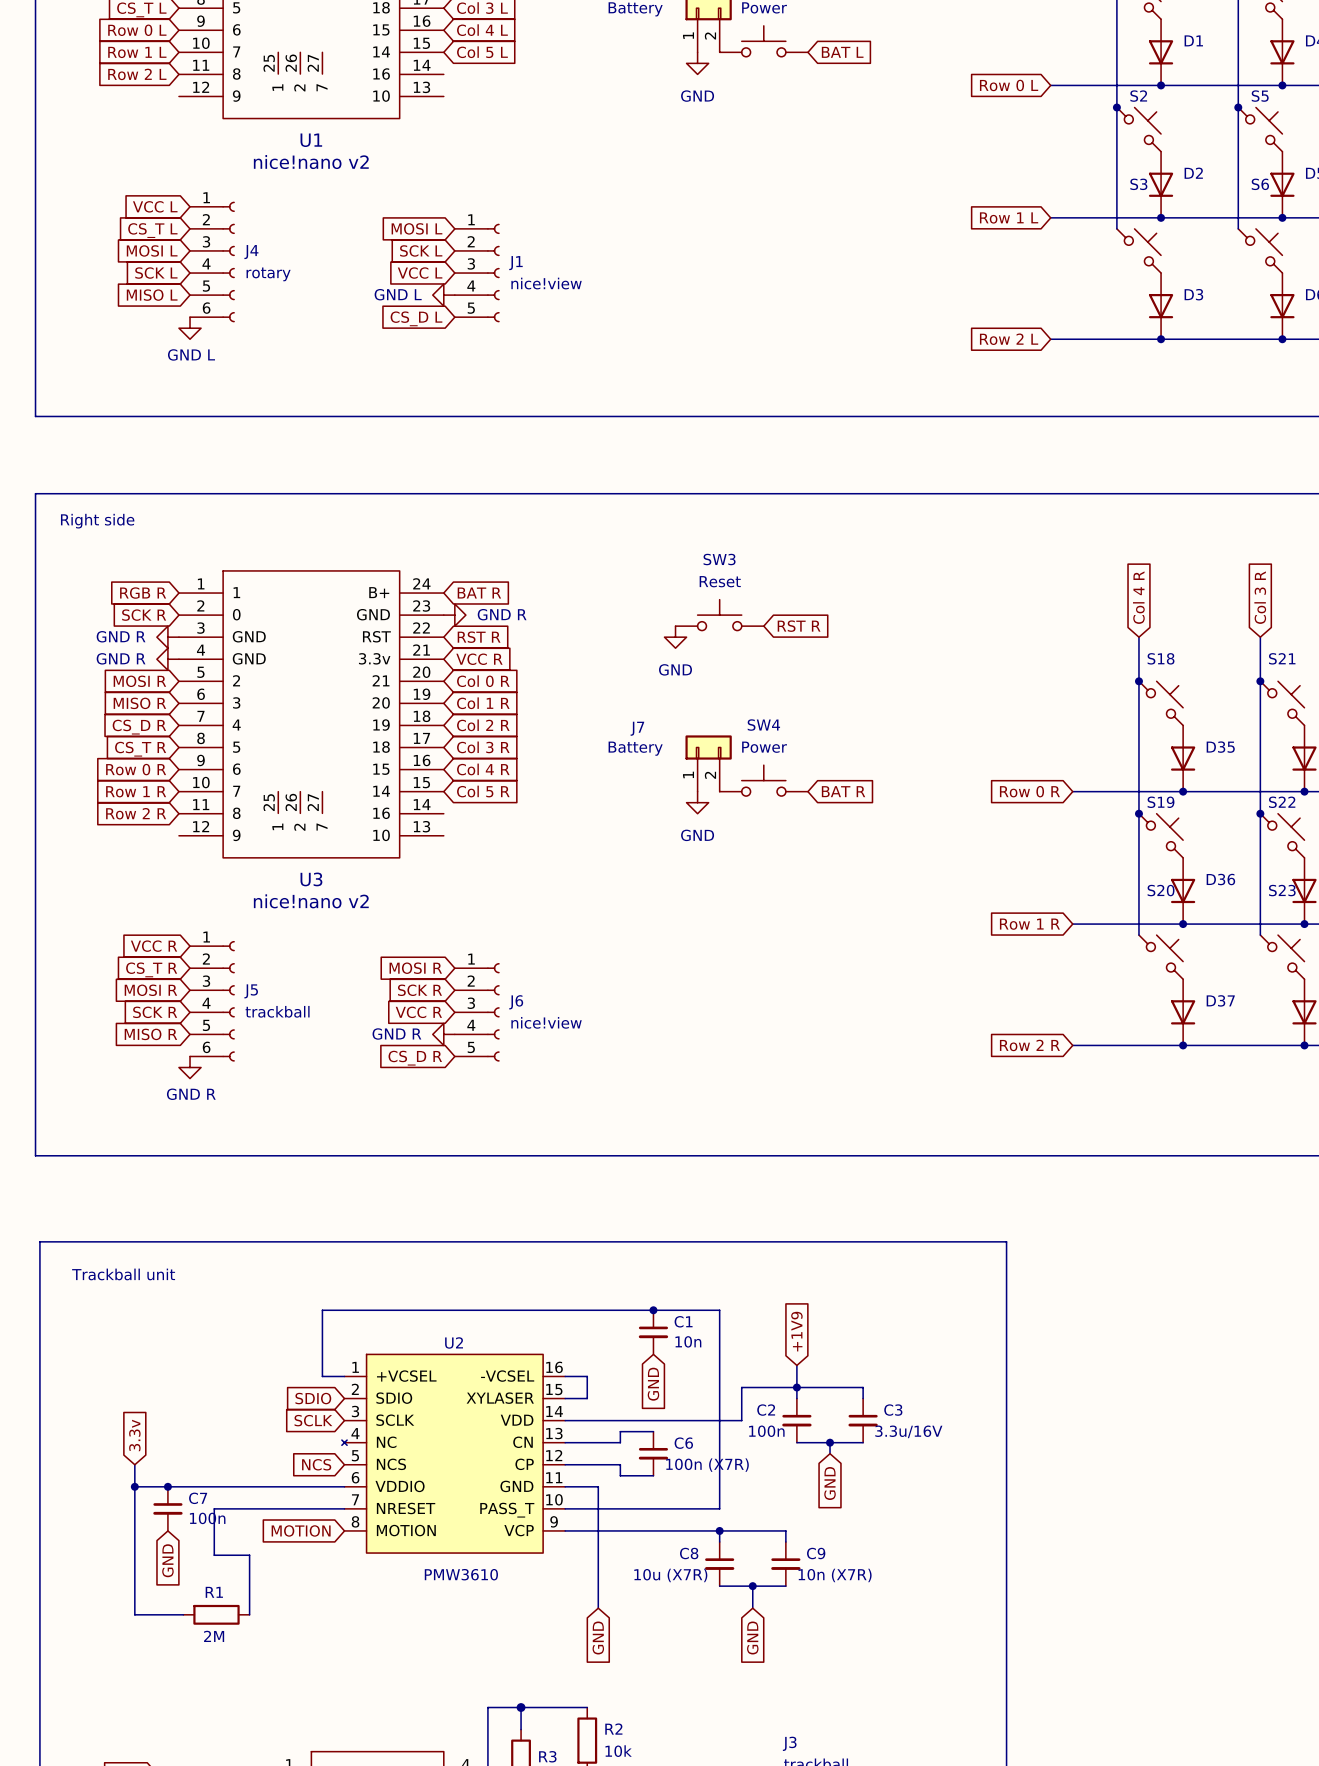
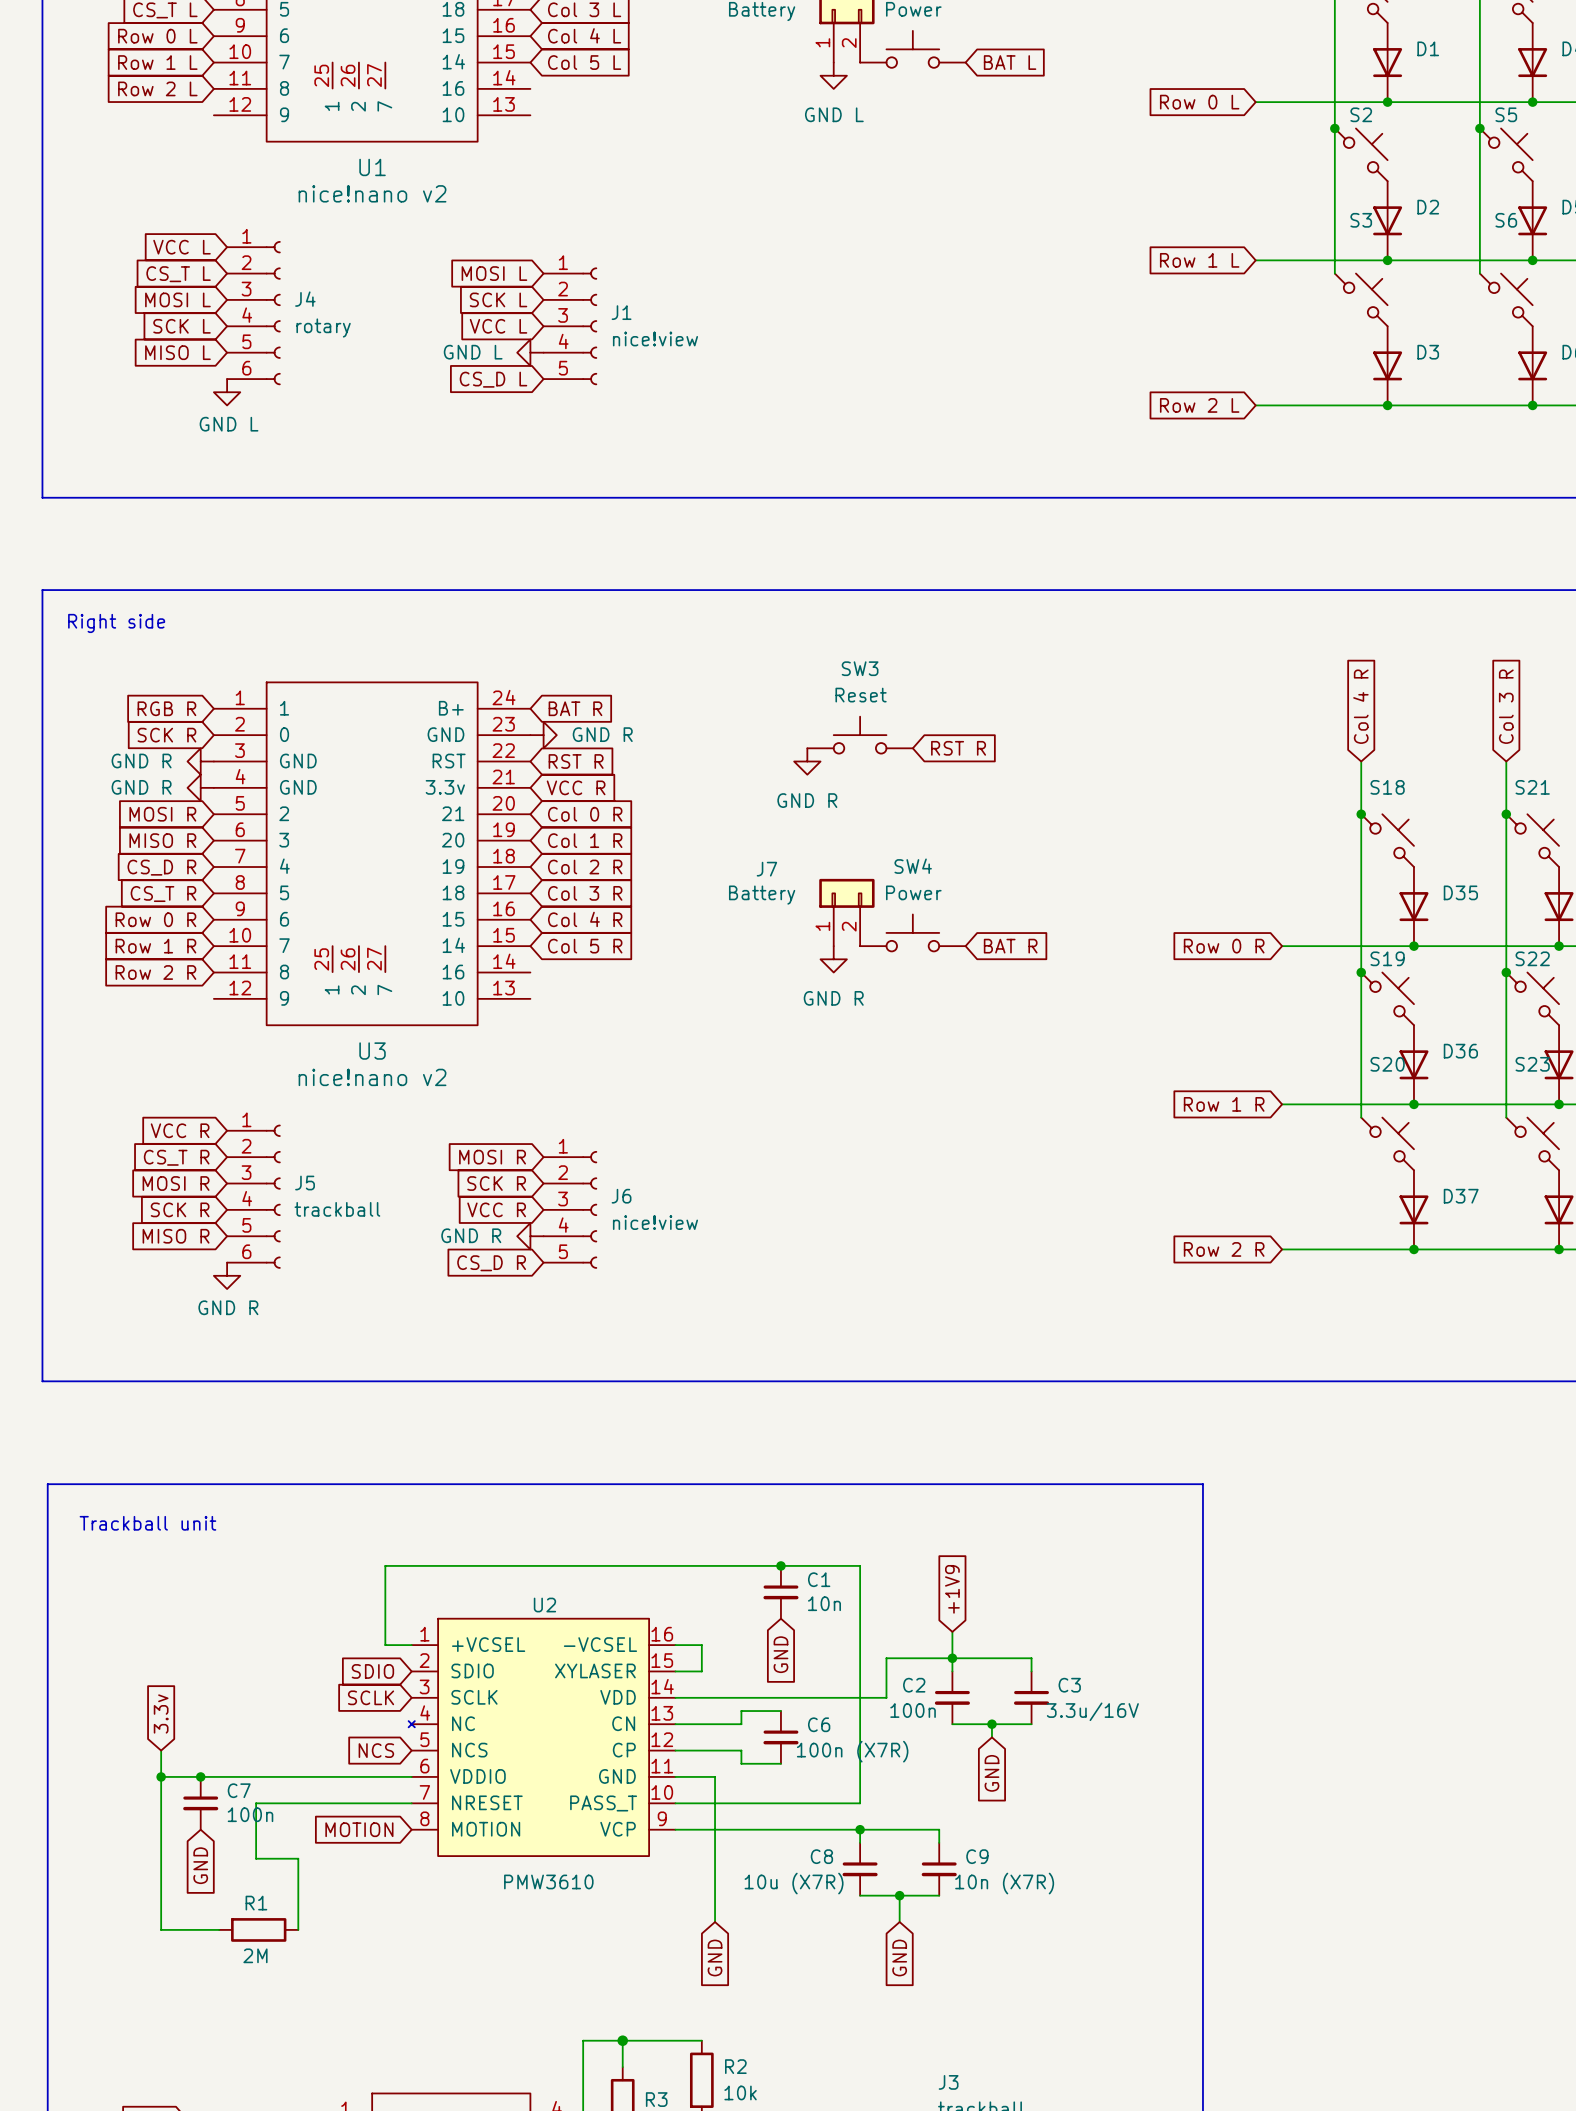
power symbol: GND (697, 63) -> GND L (833, 75)
power symbol: GND (675, 637) -> GND R (807, 761)
power symbol: GND (697, 802) -> GND R (833, 959)

